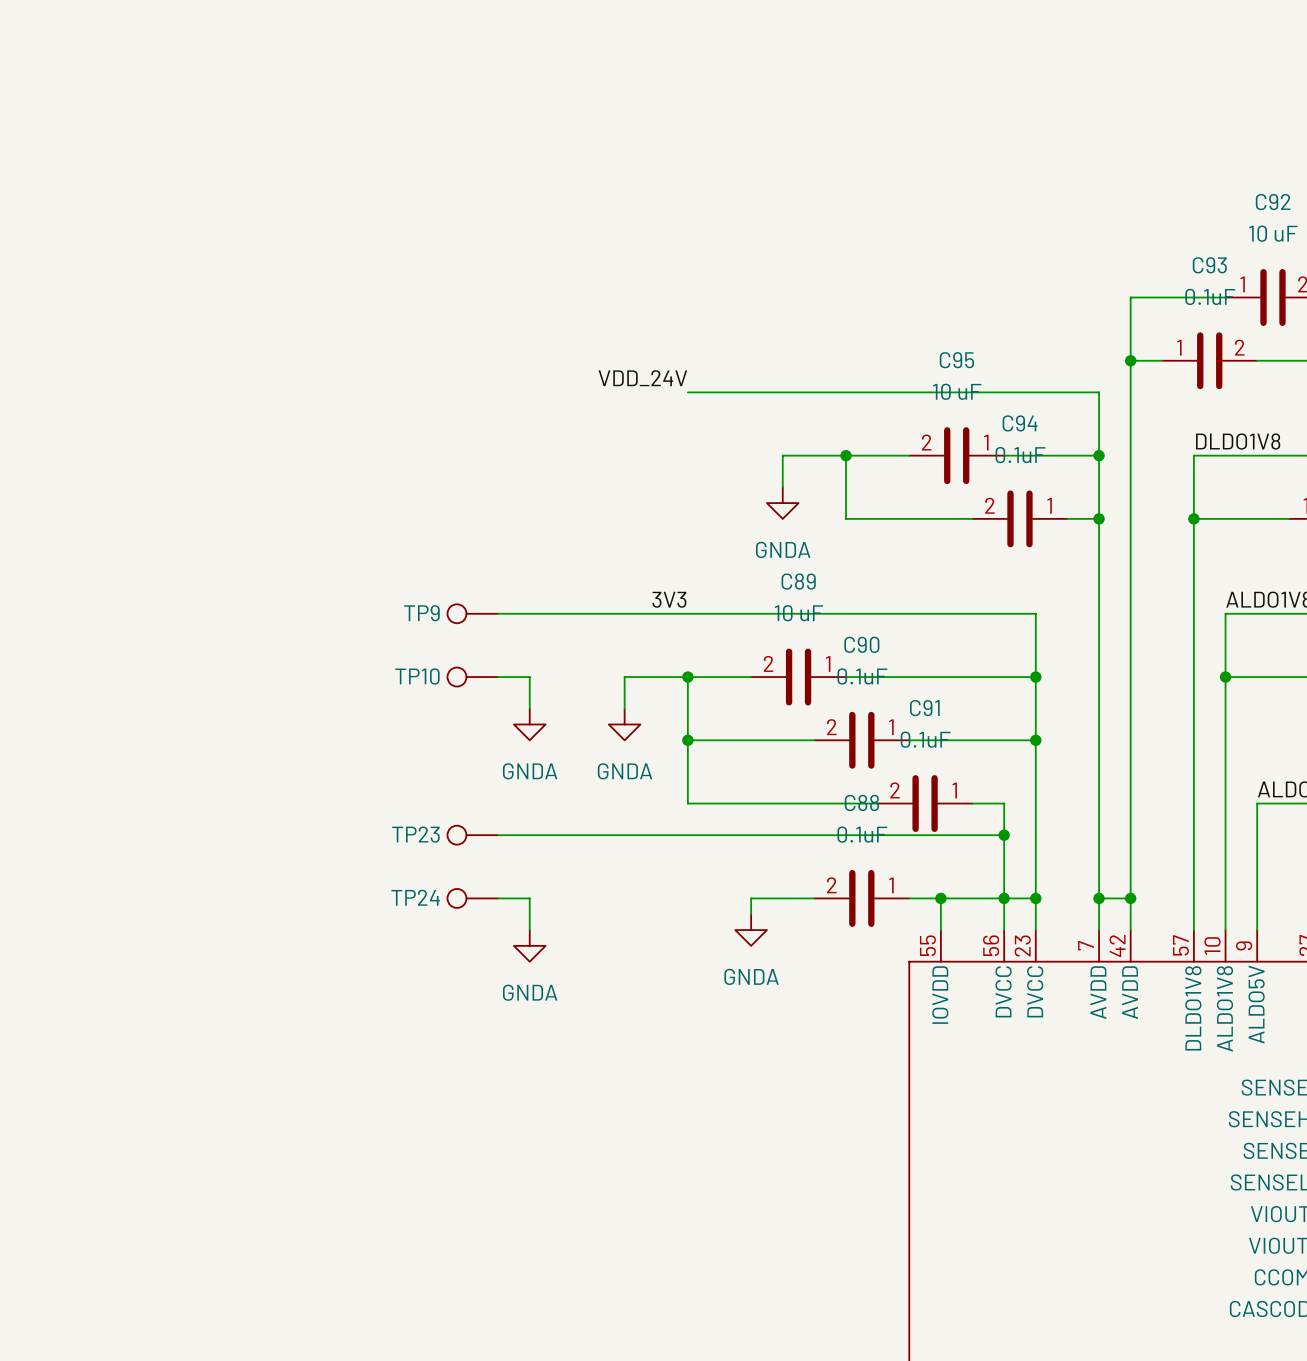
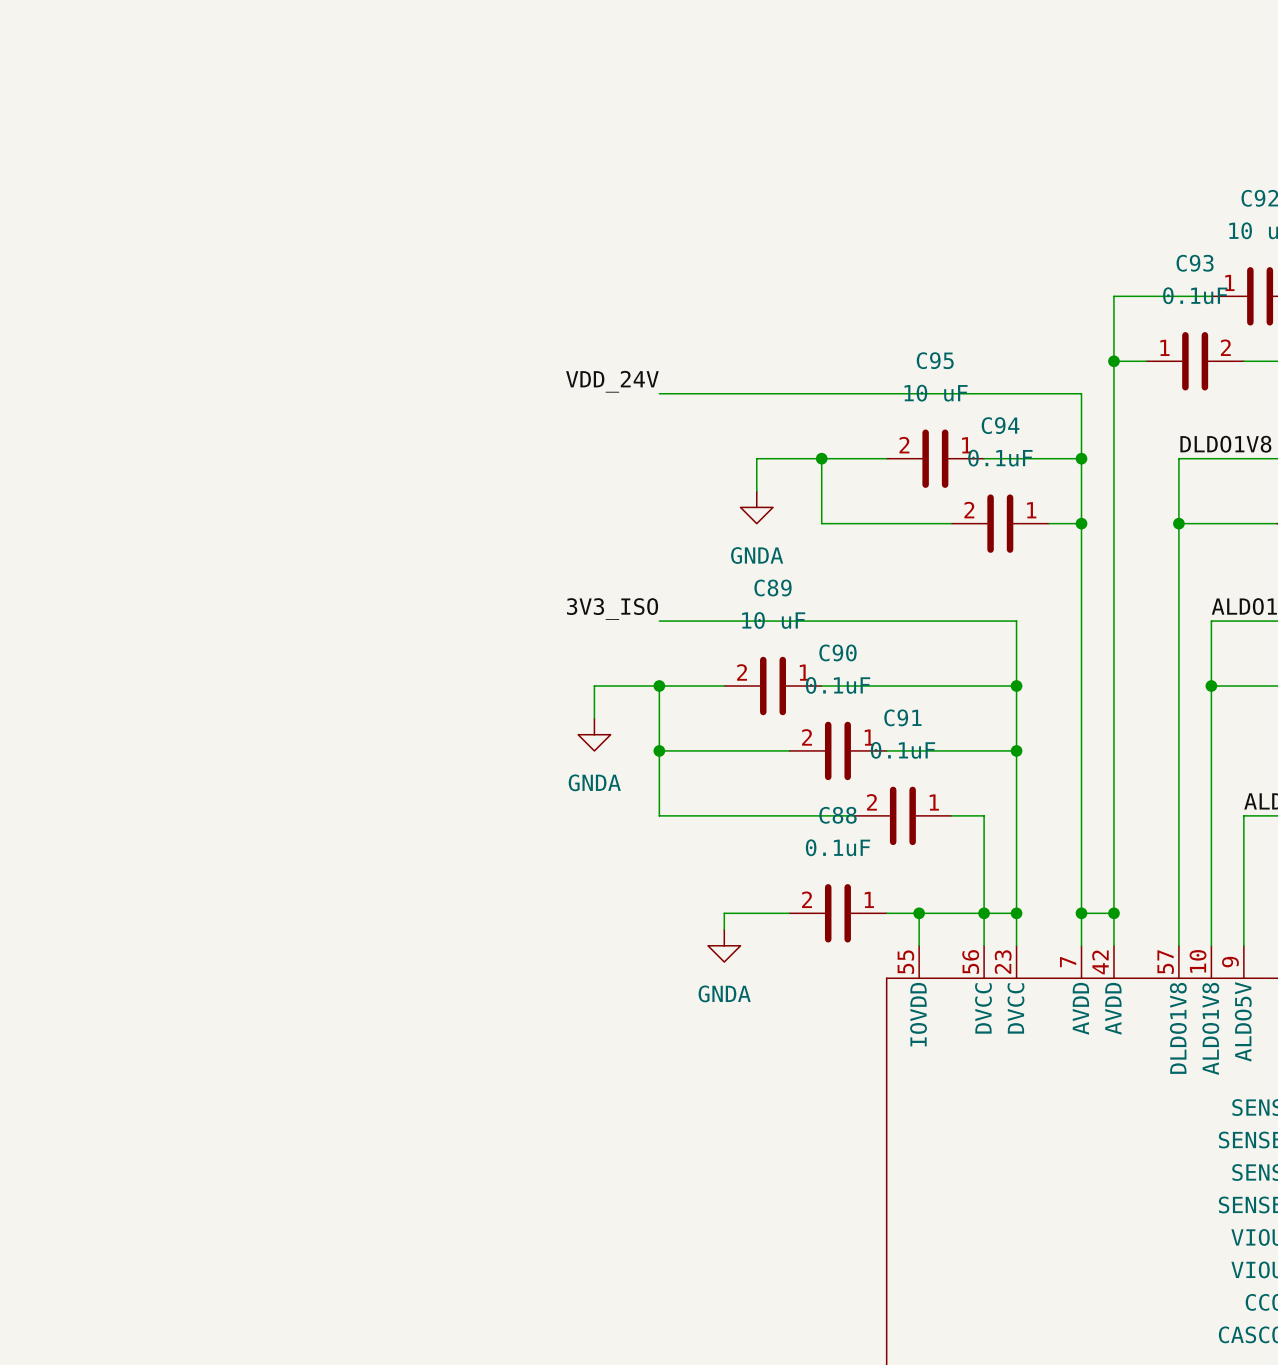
label: 3V3 (669, 599) -> 3V3_ISO (612, 609)
TP9: (472, 613) -> none
wire: (498, 613) (687, 613) -> none
TP10: (472, 677) -> none
wire: (498, 677) (529, 677) (529, 708) -> none
power symbol: GNDA (529, 724) -> none
TP23: (472, 835) -> none
wire: (498, 835) (1004, 835) -> none
junction: (1004, 835) -> none
TP24: (472, 898) -> none
wire: (498, 898) (529, 898) (529, 930) -> none
power symbol: GNDA (529, 945) -> none

